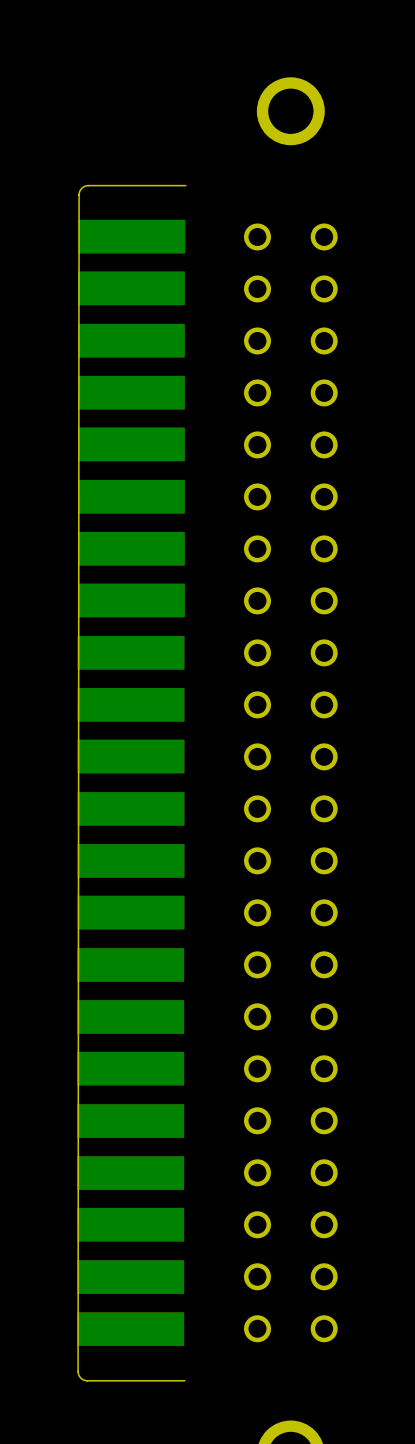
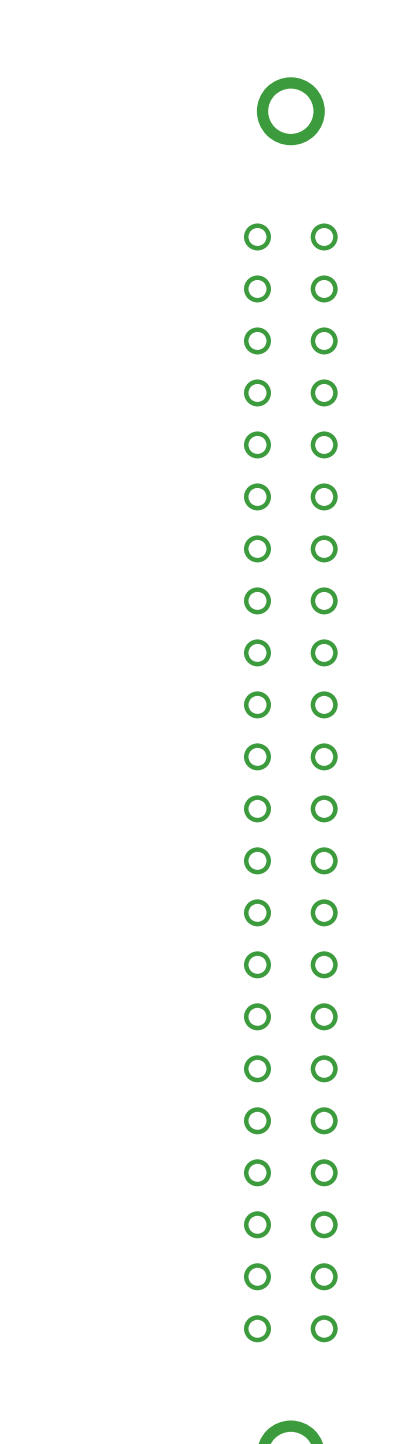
part: (131, 783) -> none

